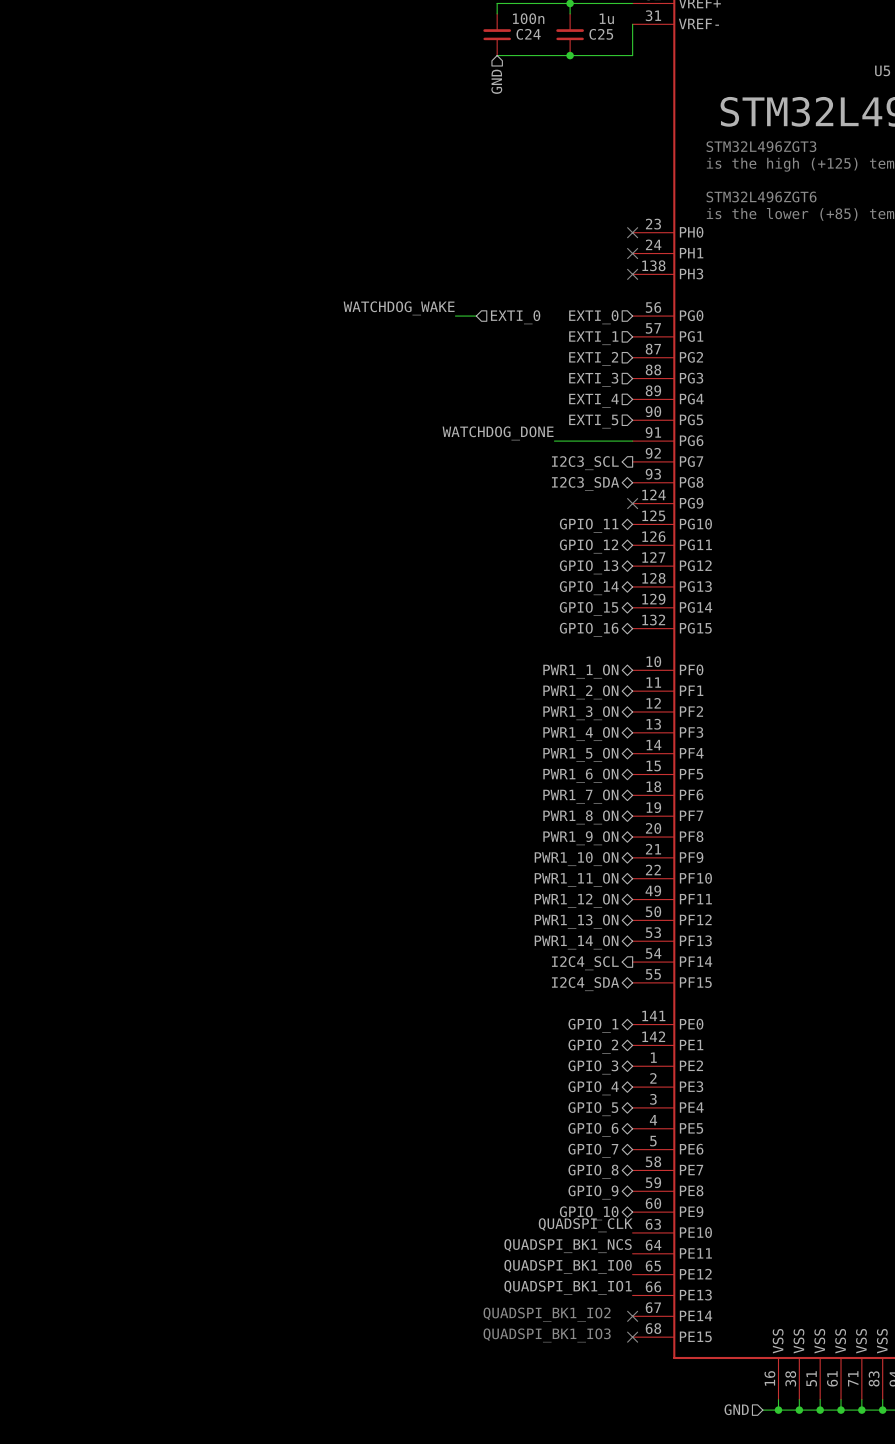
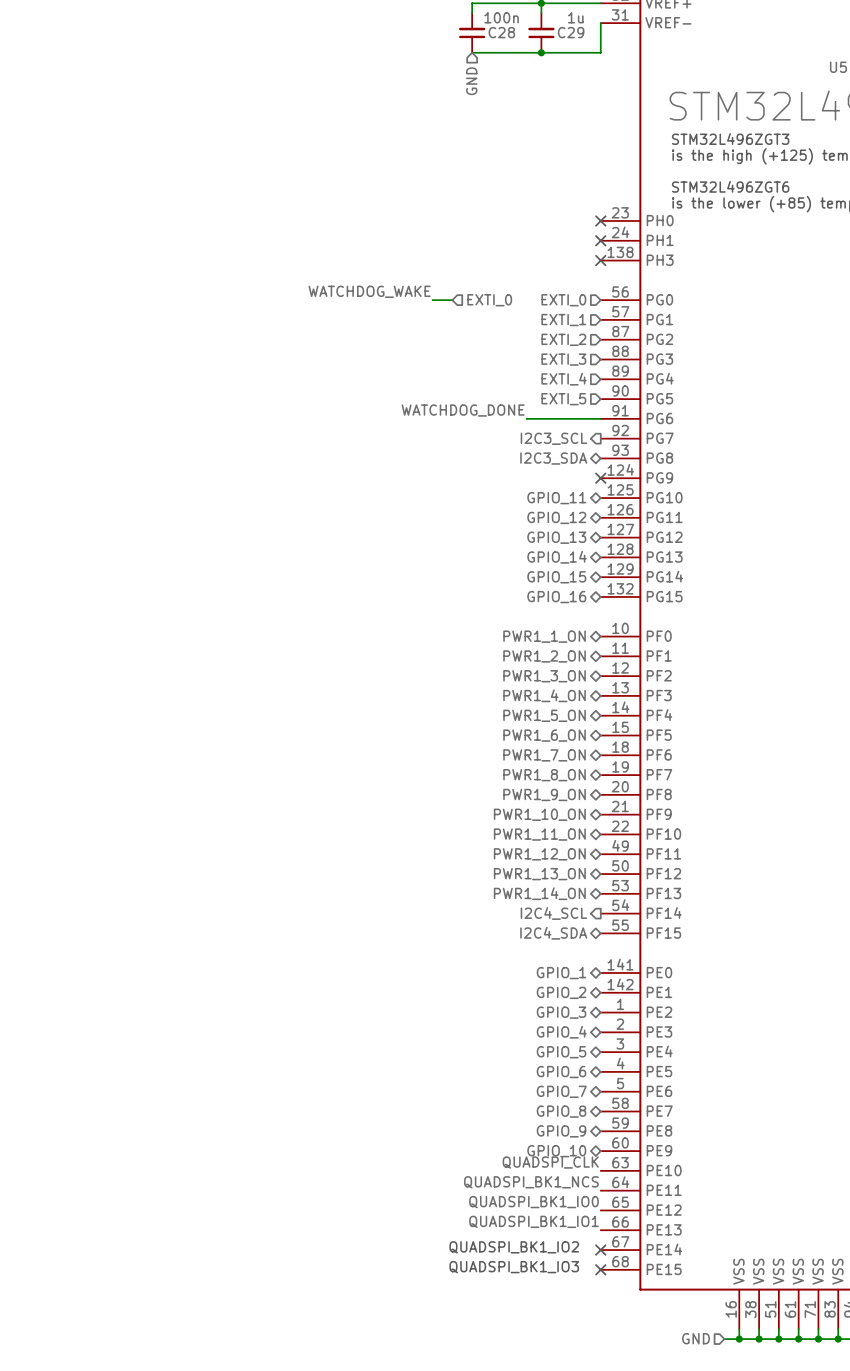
C24 name: C24 (528, 34) -> C28 (501, 32)
C25 name: C25 (601, 34) -> C29 (571, 32)

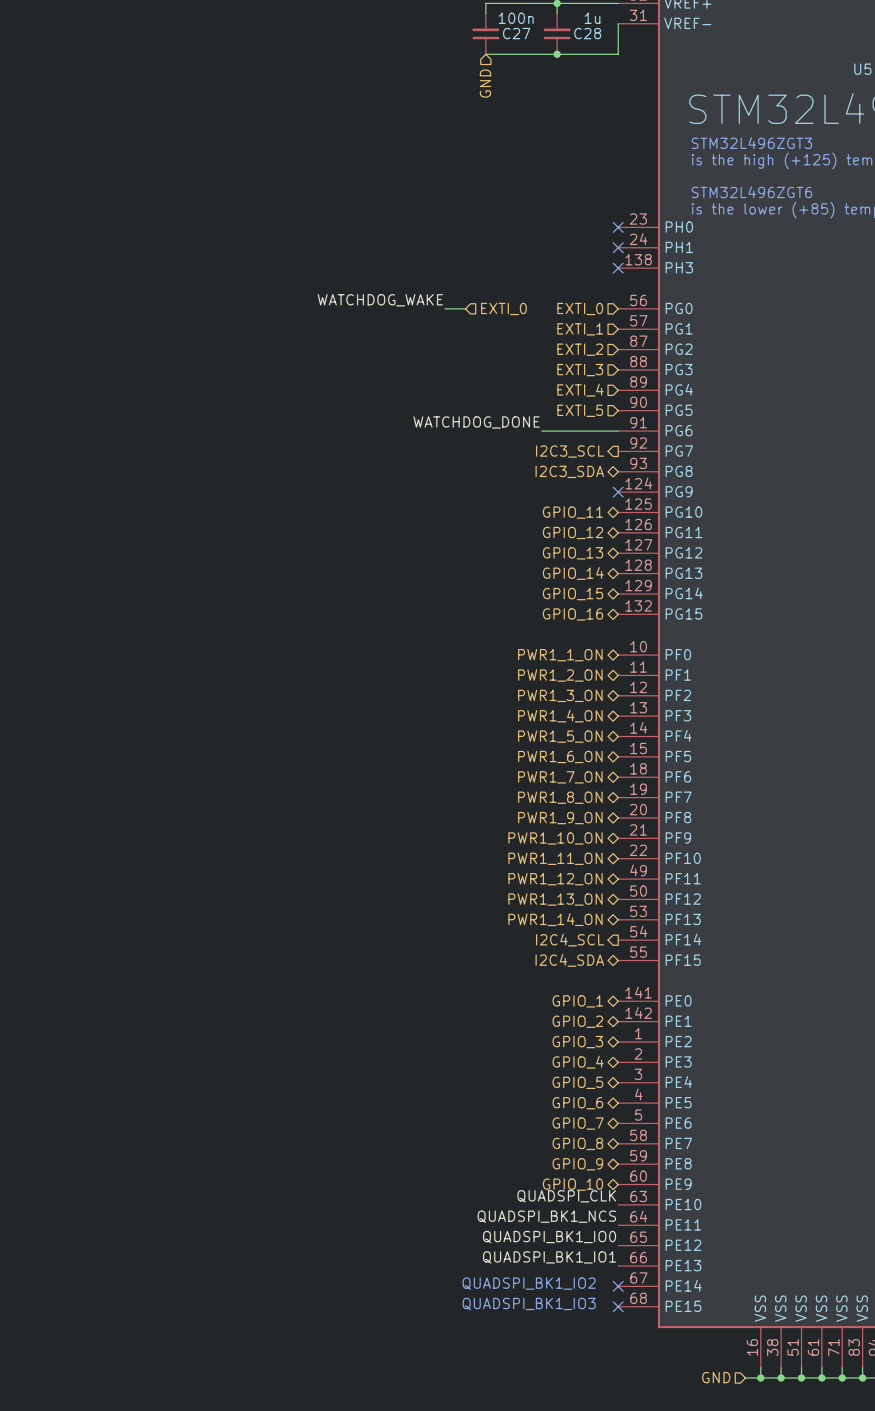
C28 name: C28 (501, 32) -> C27 (516, 33)
C29 name: C29 (571, 32) -> C28 (587, 33)

